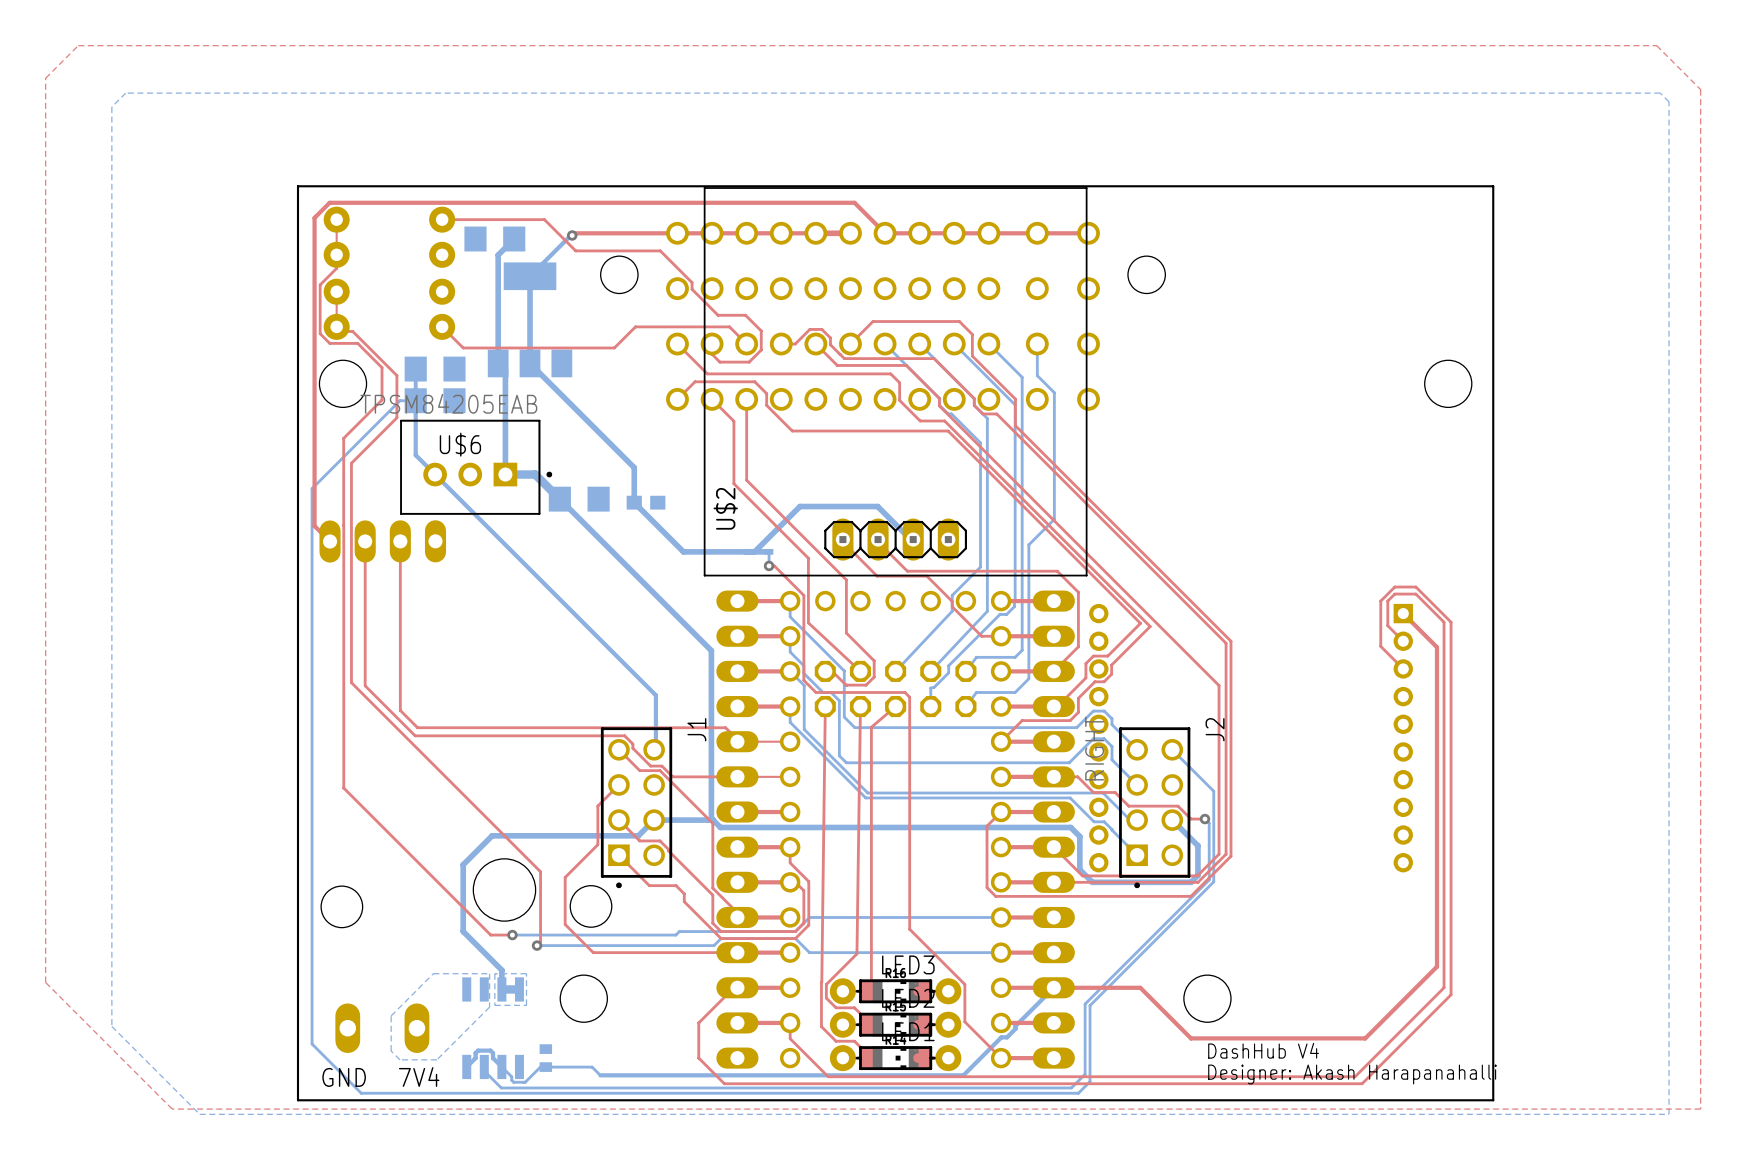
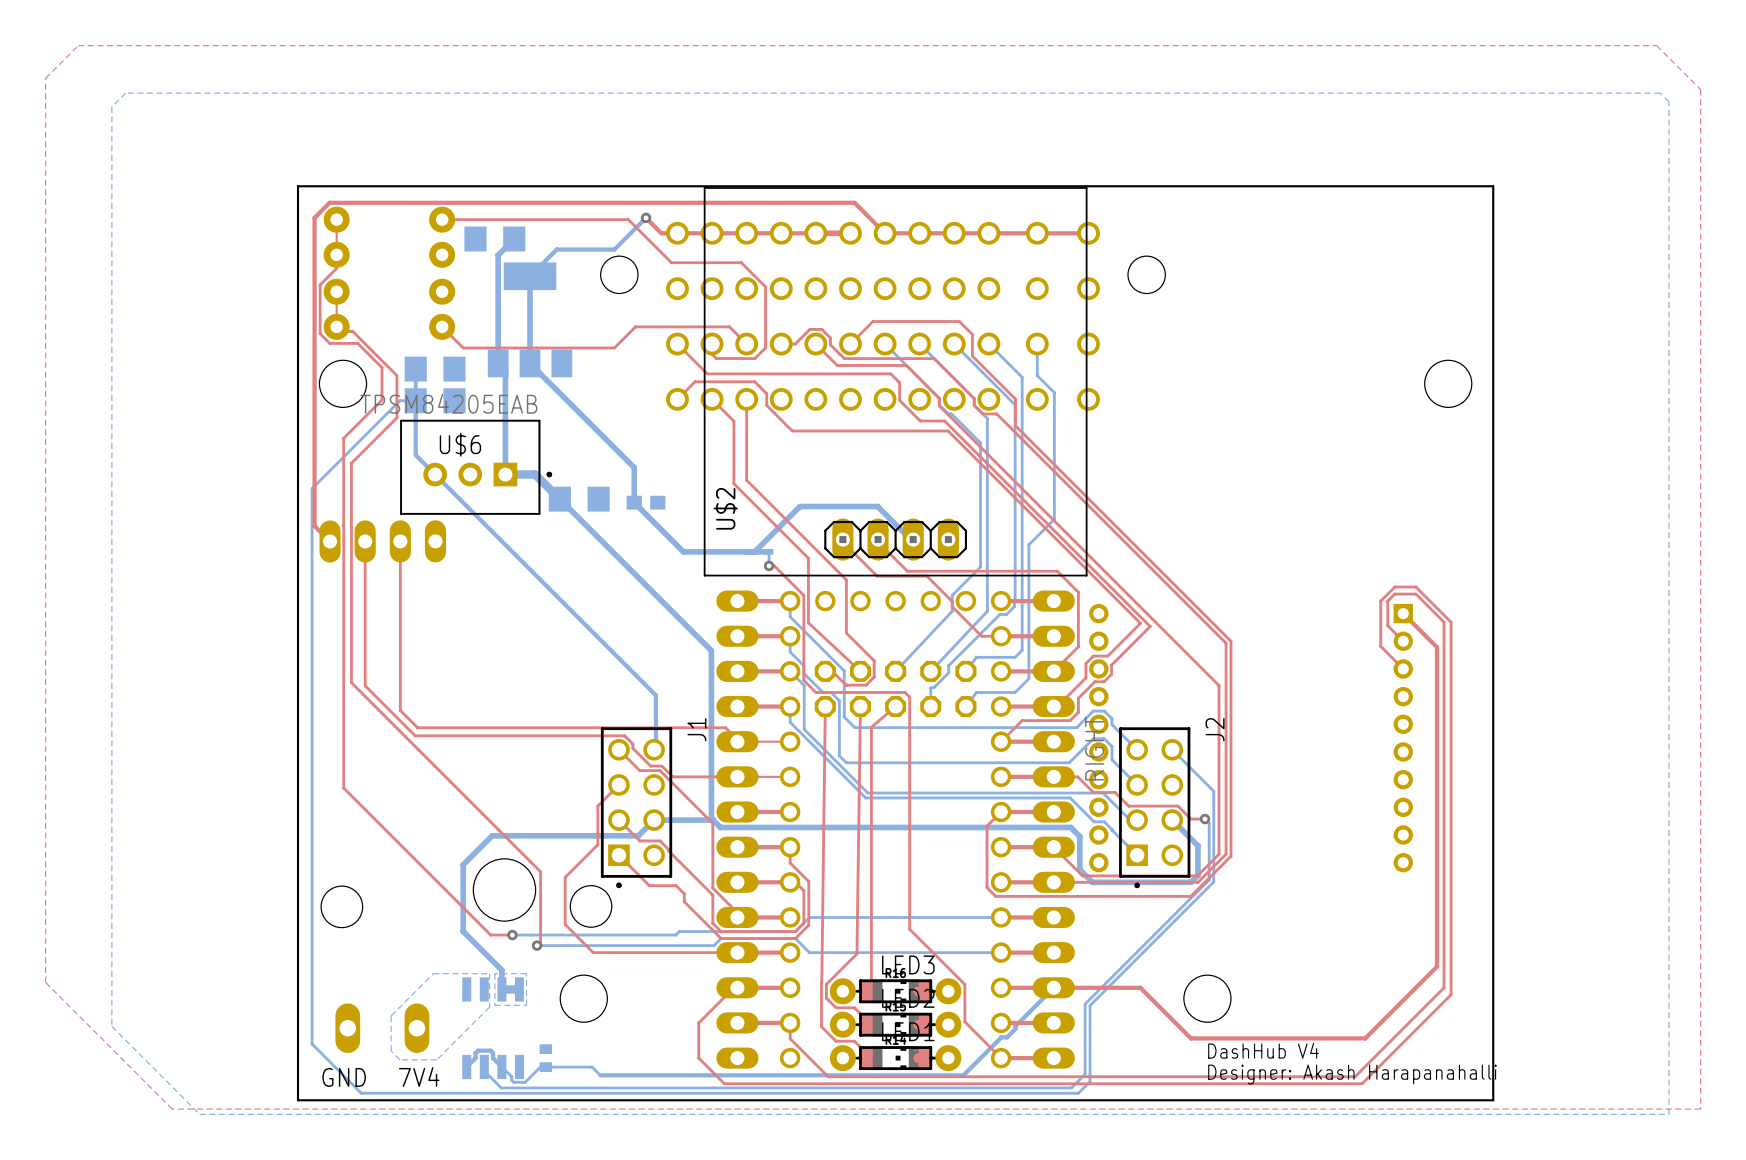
top track: (544, 219) (575, 250) (660, 250) (692, 282) (692, 289) (718, 315) (745, 315) (761, 330) (761, 350) (749, 362) (719, 362) (716, 358) -> (544, 219) (628, 219) (671, 262) (741, 262) (765, 286) (765, 347) (754, 358) (716, 358)
top track: (661, 233) (574, 233) (572, 235) -> (661, 233) (646, 217)
bottom track: (572, 235) (556, 249) -> (646, 217) (614, 249) (556, 249)
via position: (572, 235) -> (646, 217)

